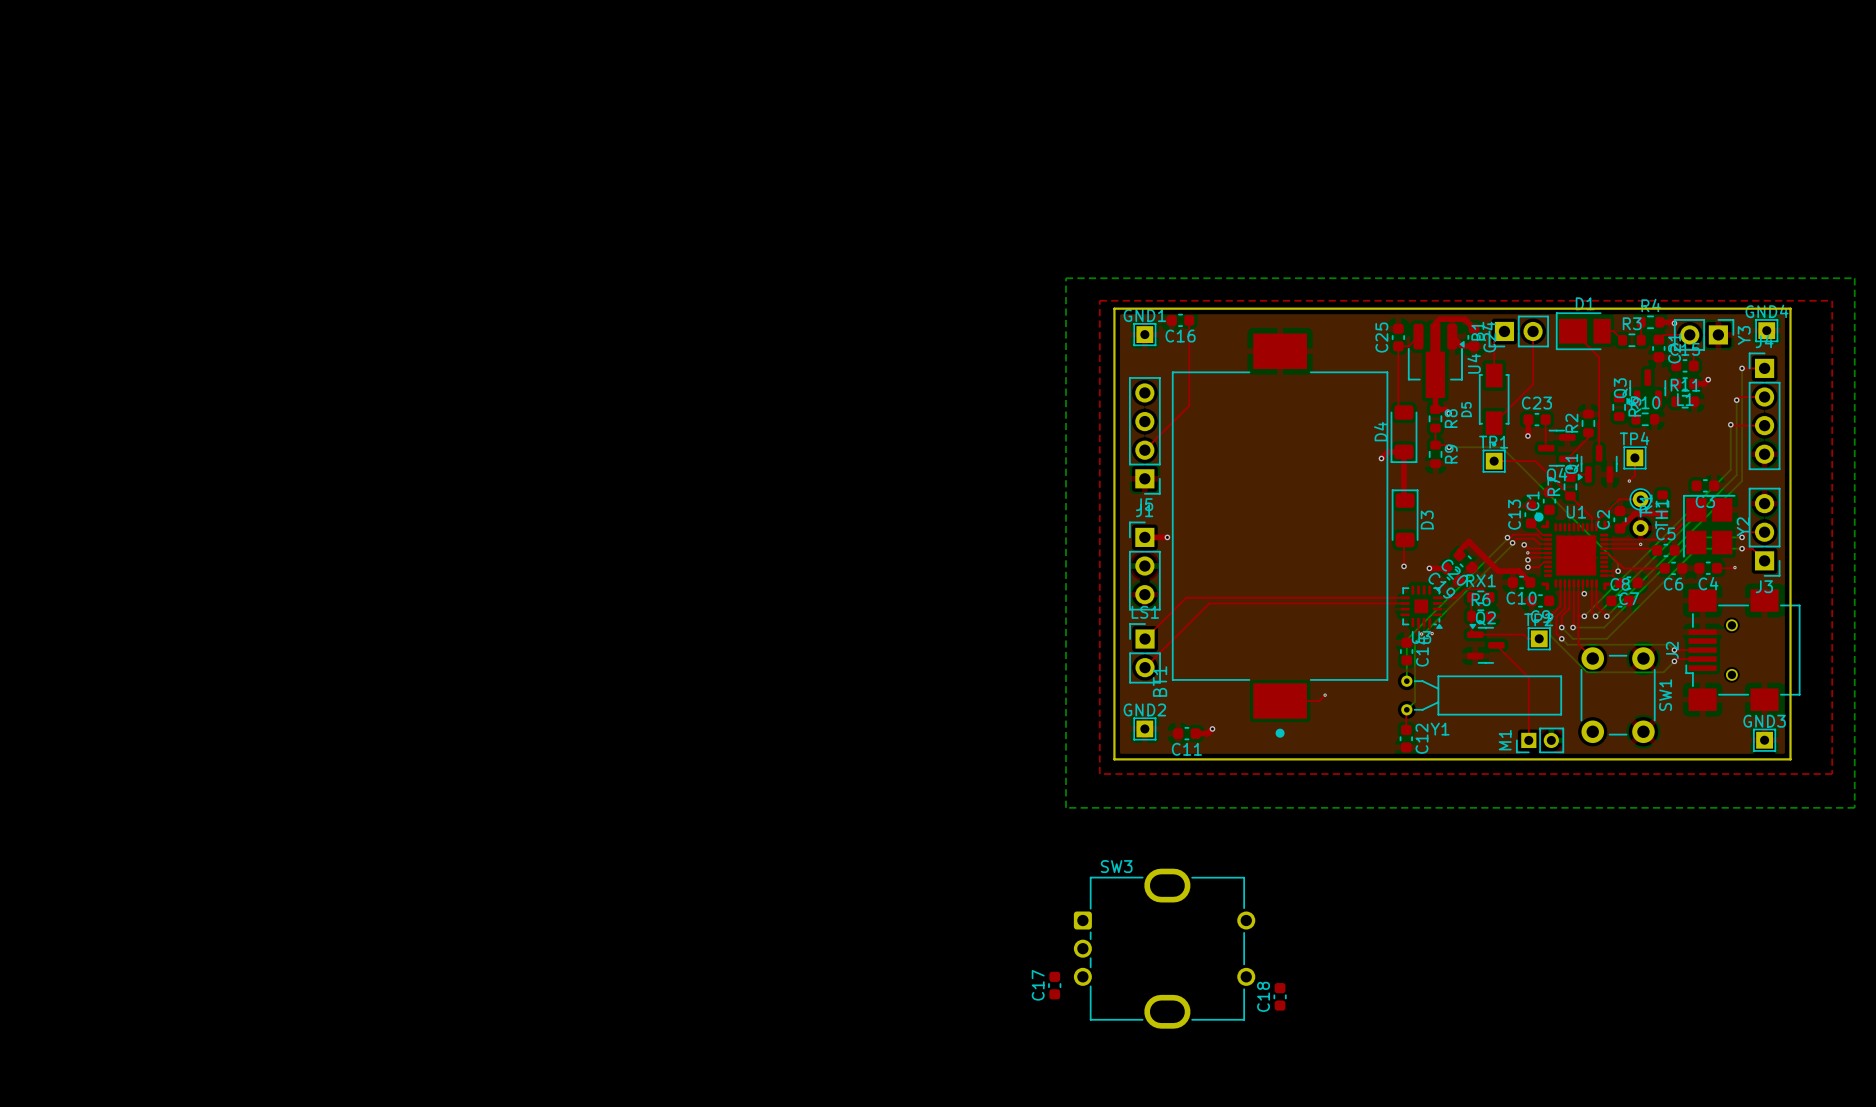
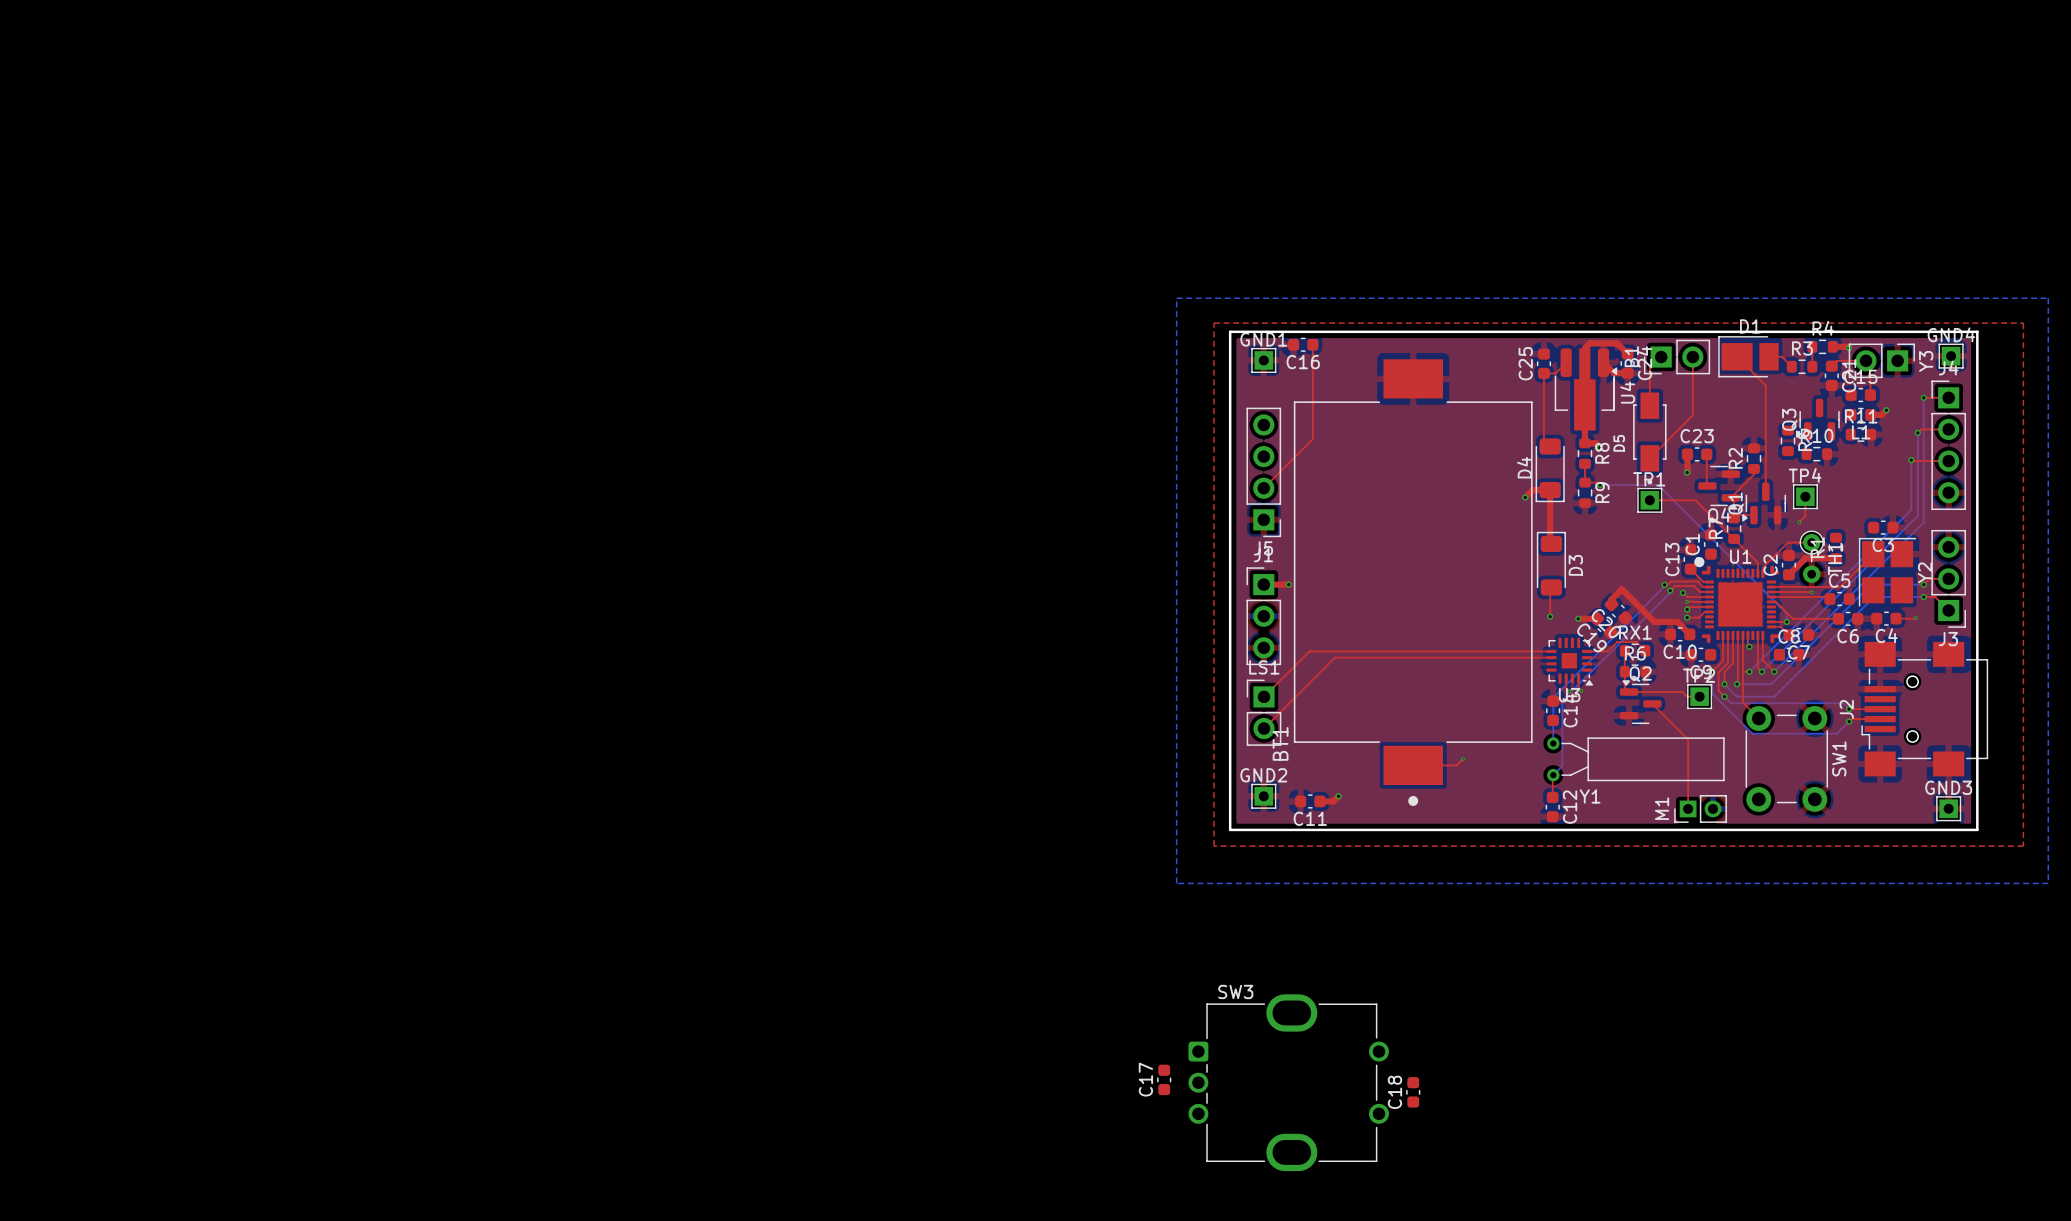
SW3 position: (1164, 948) -> (1288, 1082)

